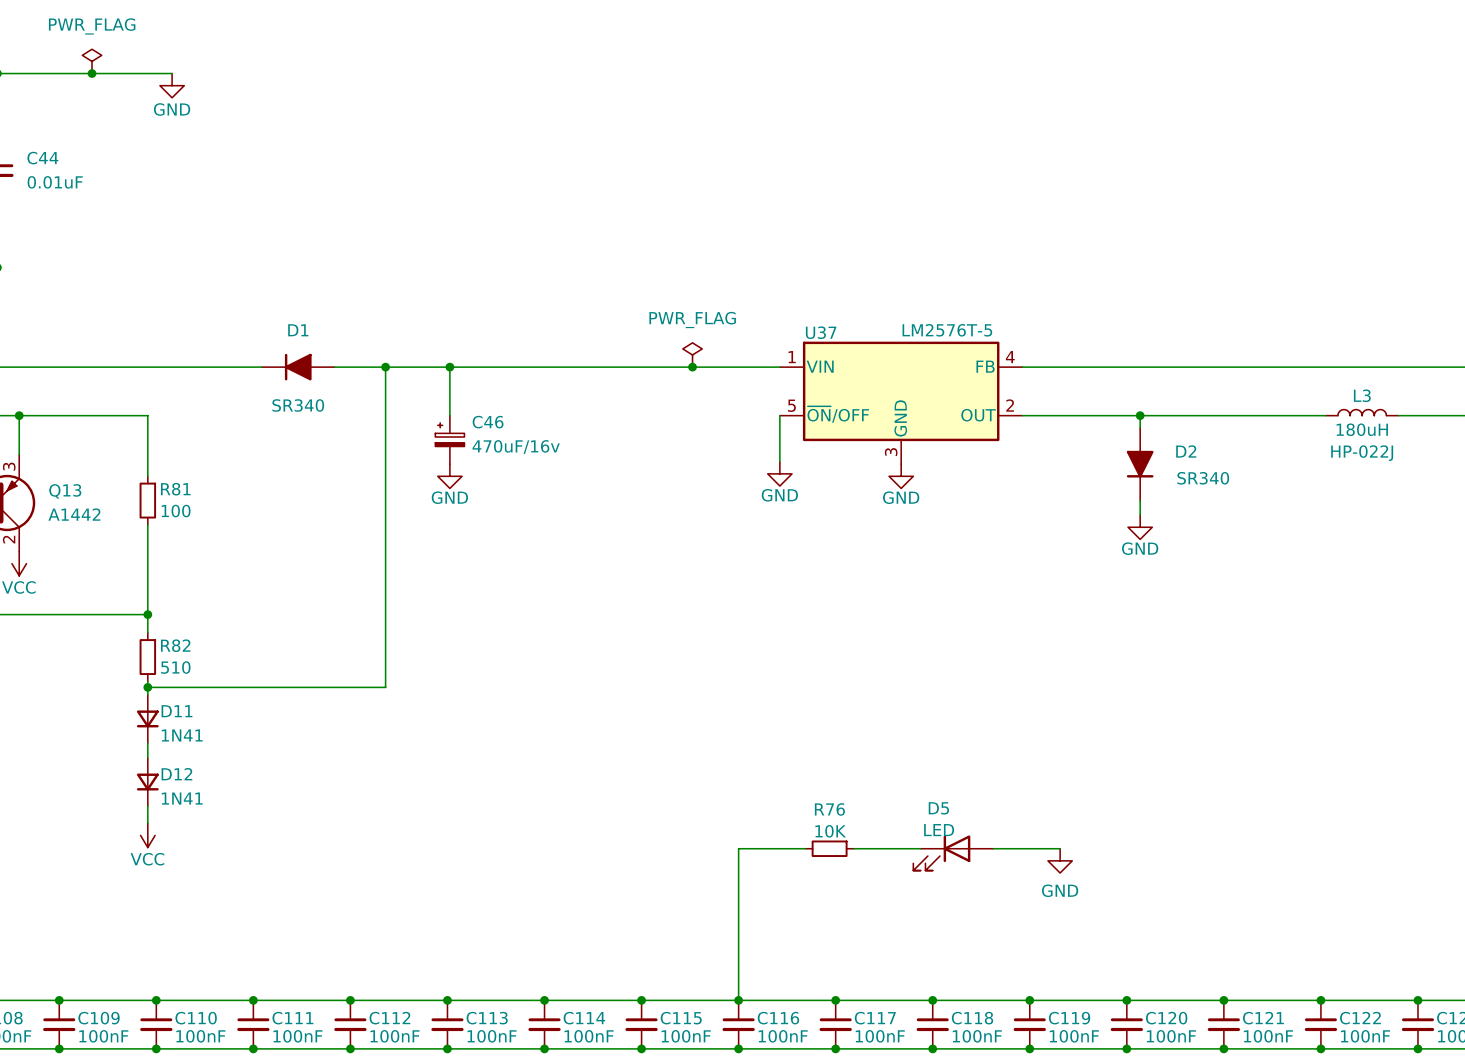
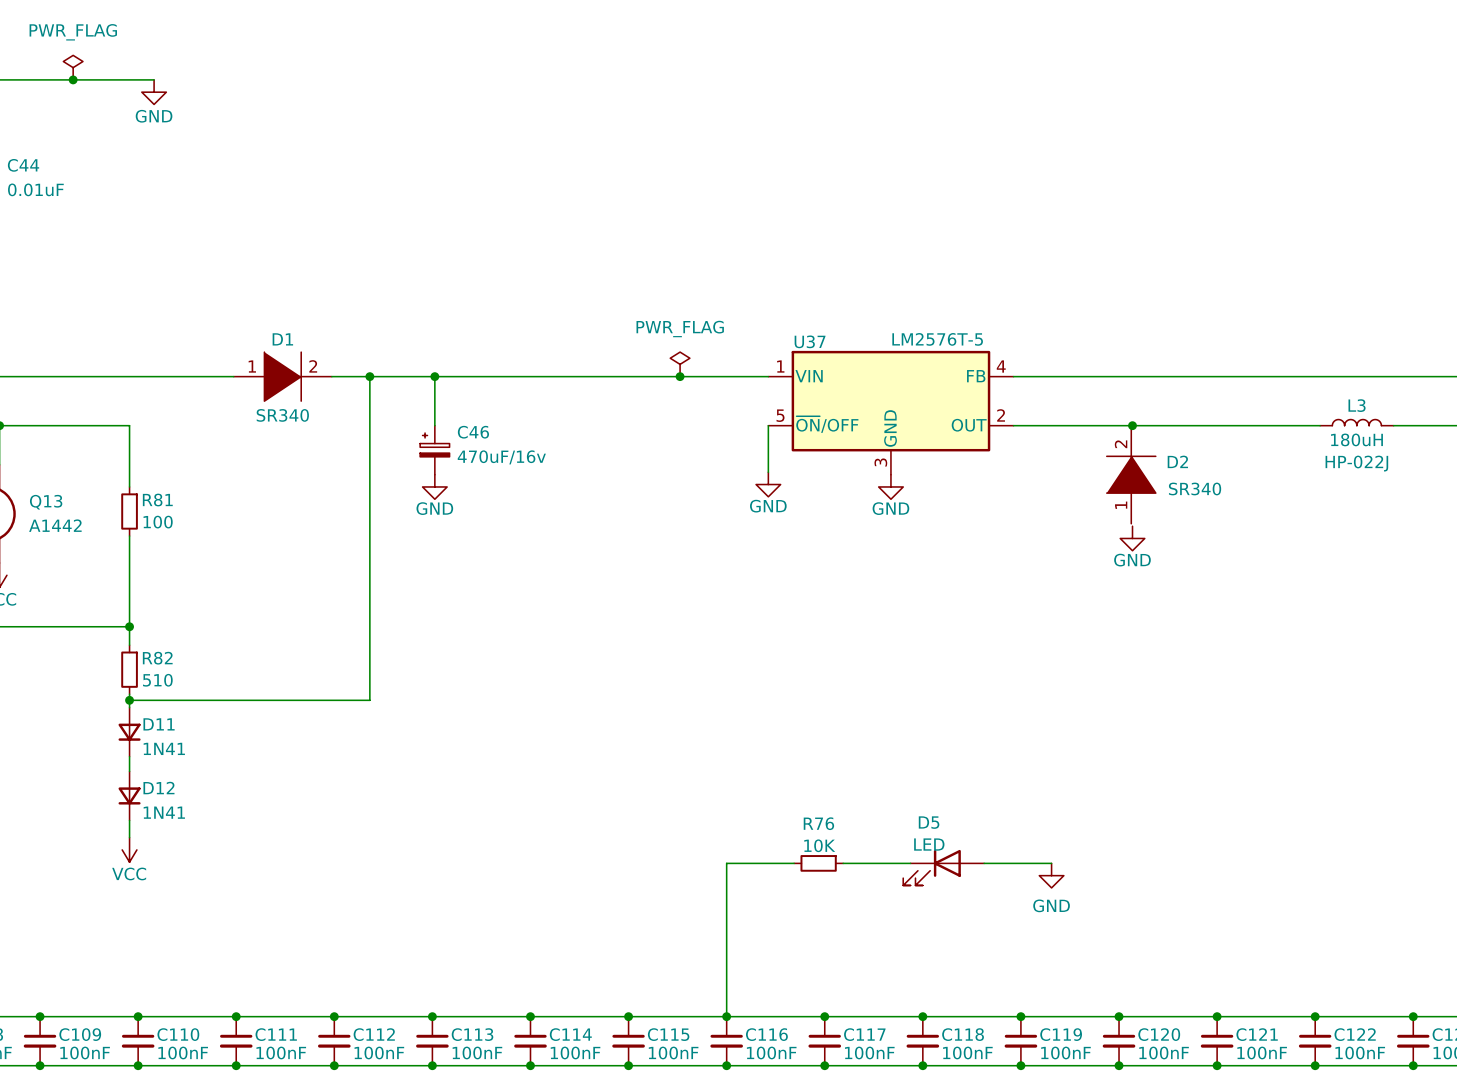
D1 symbol: [261, 353, 335, 381] -> [233, 352, 332, 402]
wire: (1140, 415) (1140, 427) -> none
D2 symbol: [1126, 427, 1154, 501] -> [1106, 425, 1156, 524]
wire: (1140, 500) (1140, 515) -> none

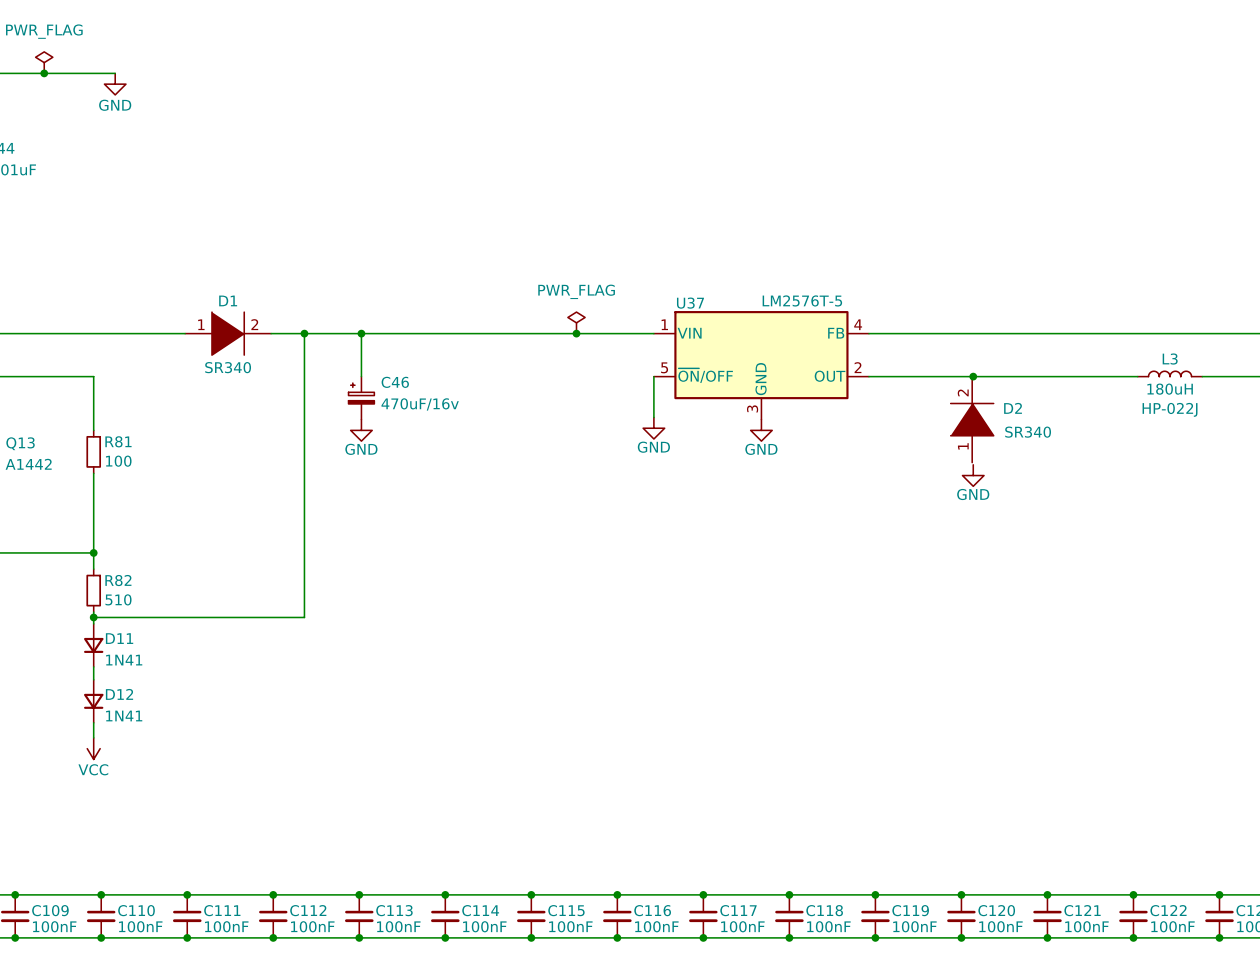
wire: (794, 863) (726, 863) (726, 1016) -> none
R76: 10K (818, 863) -> none
wire: (843, 863) (910, 863) -> none
wire: (984, 863) (1051, 863) -> none
D5: LED (943, 867) -> none
power symbol: GND (1051, 875) -> none

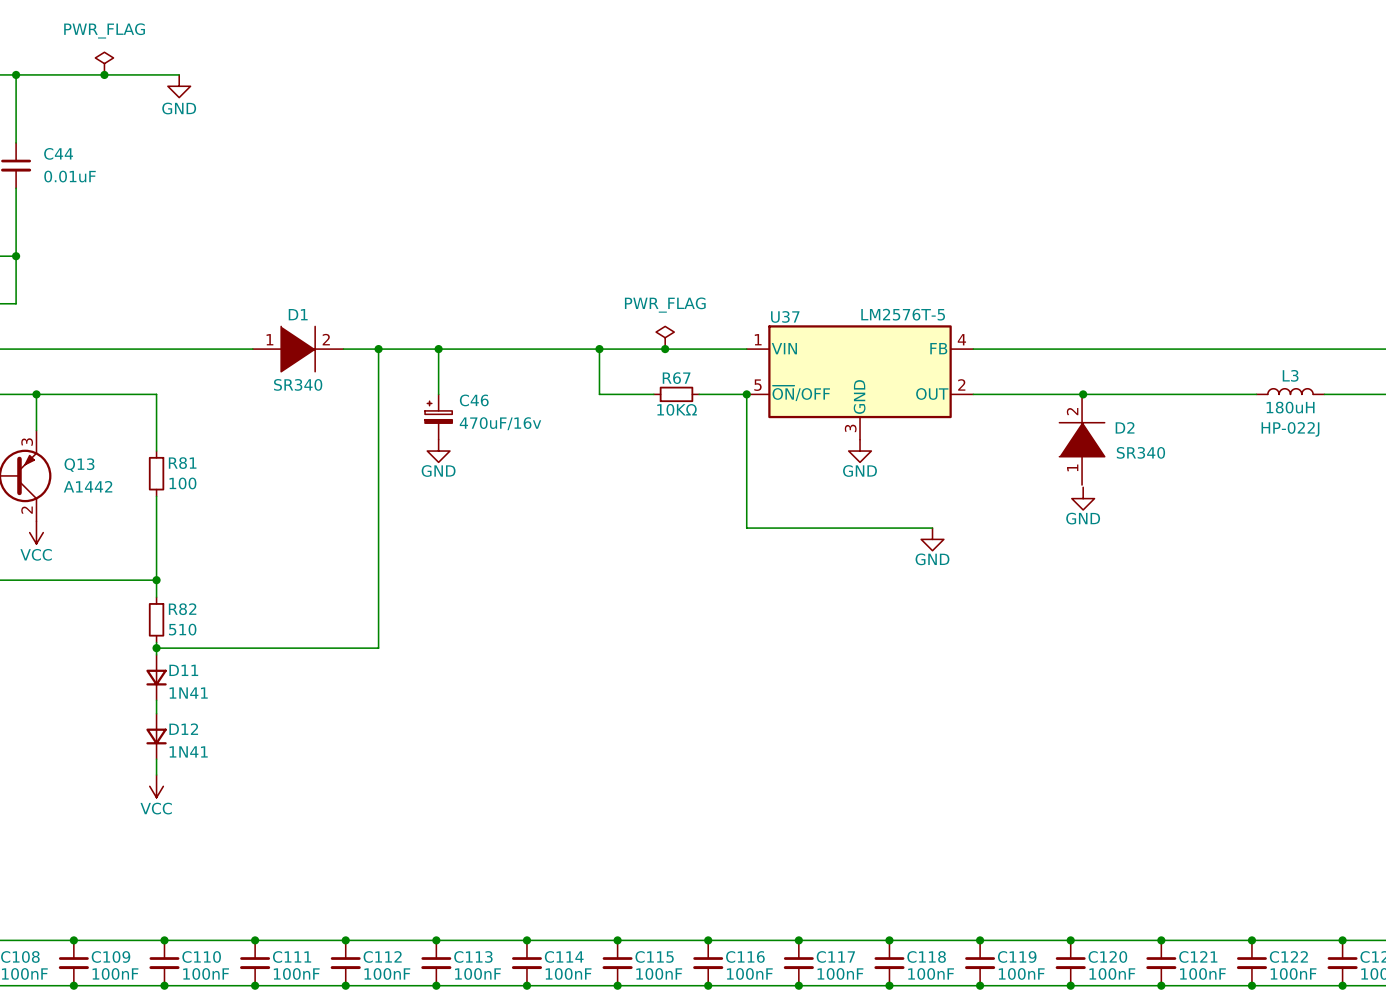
wire: none -> (599, 349) (599, 394) (653, 394)
junction: none -> (599, 349)
R67: none -> 10KΩ (676, 394)
wire: none -> (699, 394) (746, 394)
junction: none -> (746, 394)
wire: none -> (746, 437) (746, 528) (932, 528)
power symbol position: GND (653, 428) -> GND (932, 539)

